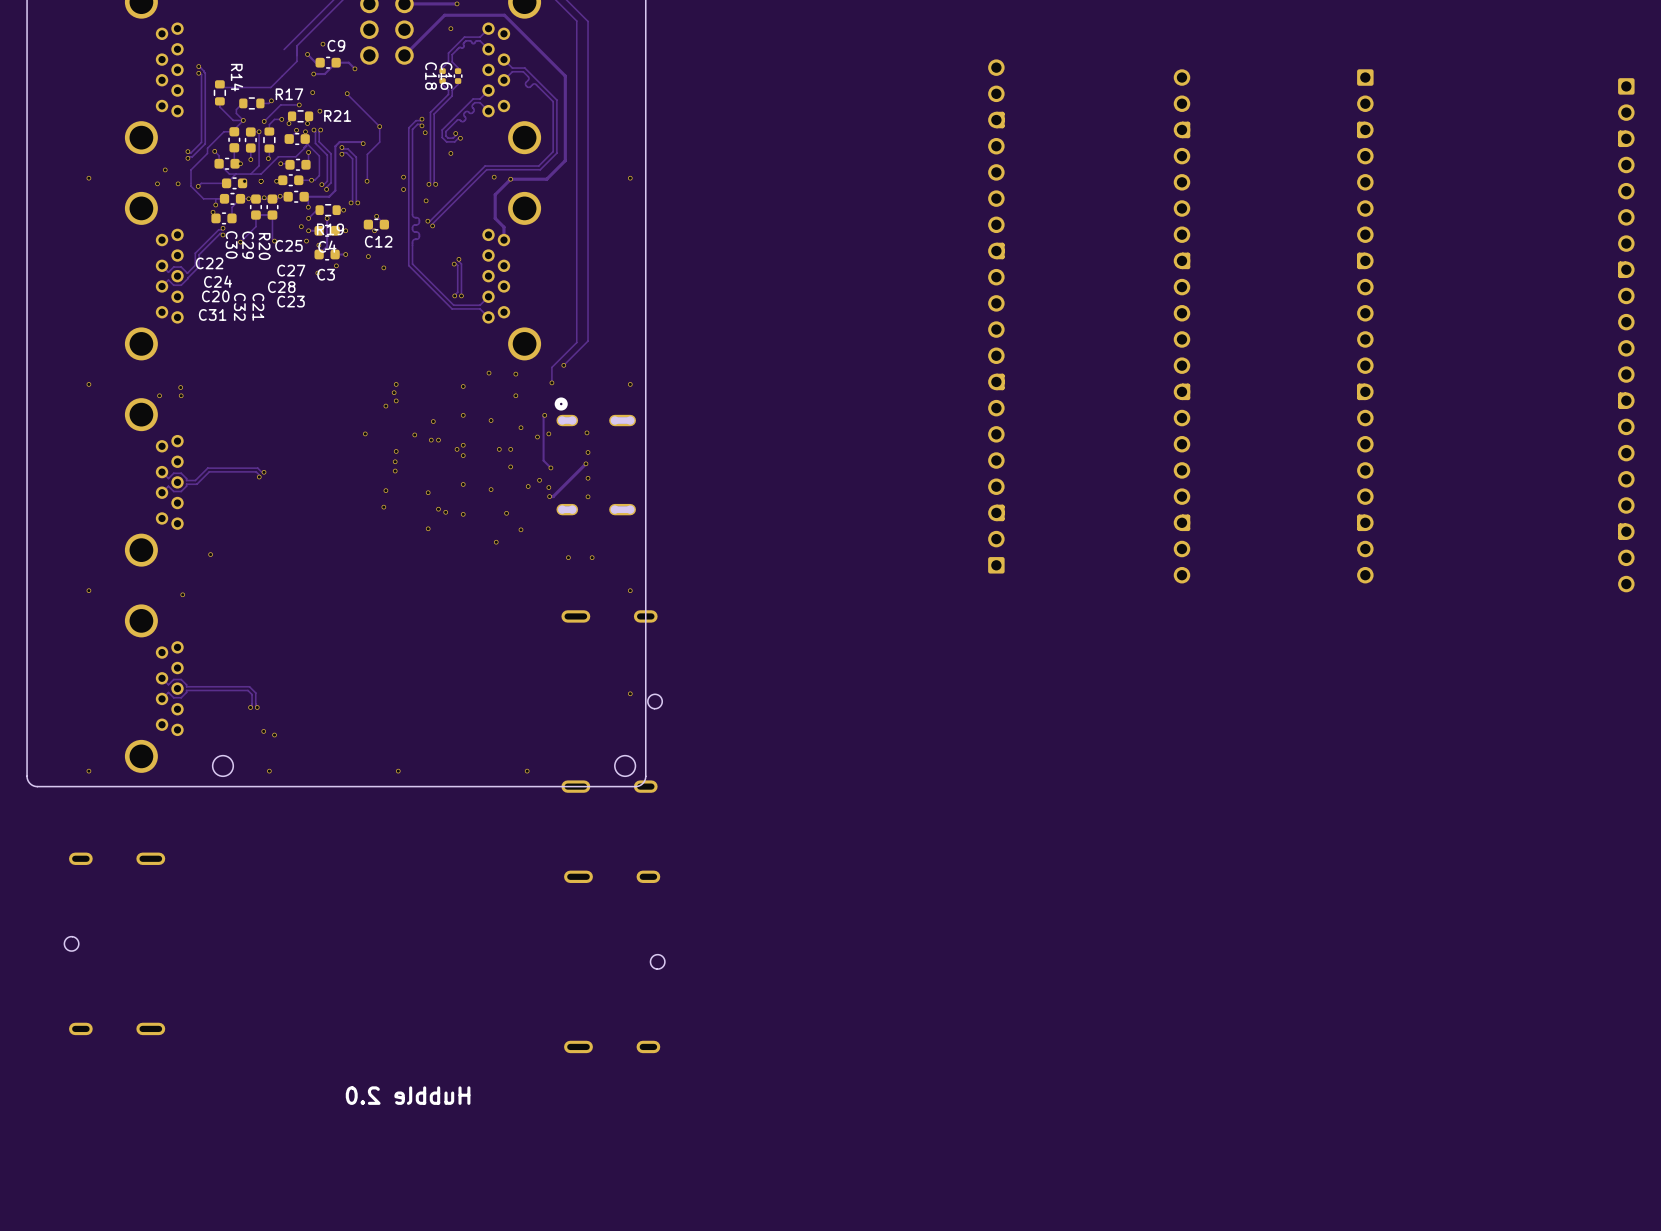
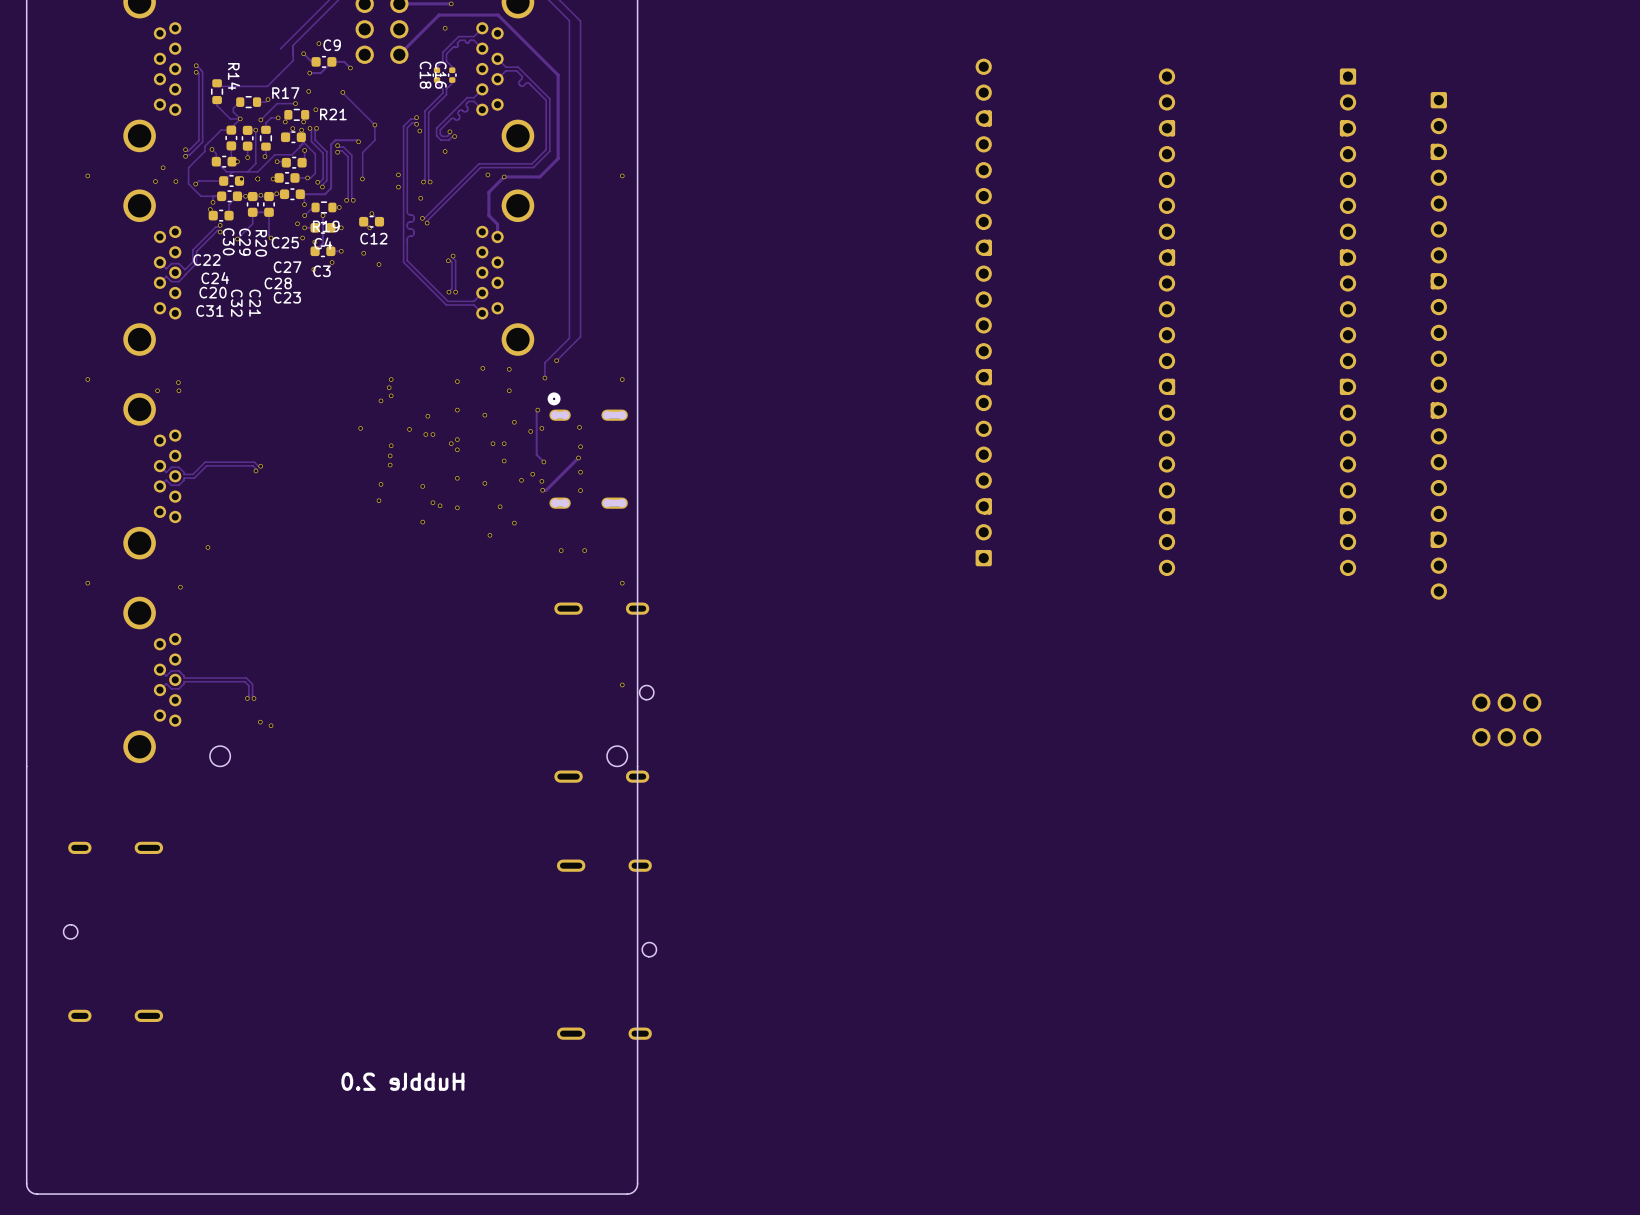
part position: (1626, 335) -> (1438, 345)
part: none -> (1506, 719)
via: (88, 771) -> none
via: (269, 771) -> none
via: (398, 771) -> none
via: (527, 771) -> none
board edge: (645, 776) (642, 783) (635, 786) (37, 786) (30, 783) (27, 776) -> (637, 766) (637, 1183) (634, 1191) (627, 1194) (36, 1194) (30, 1191) (26, 1183) (26, 766)

